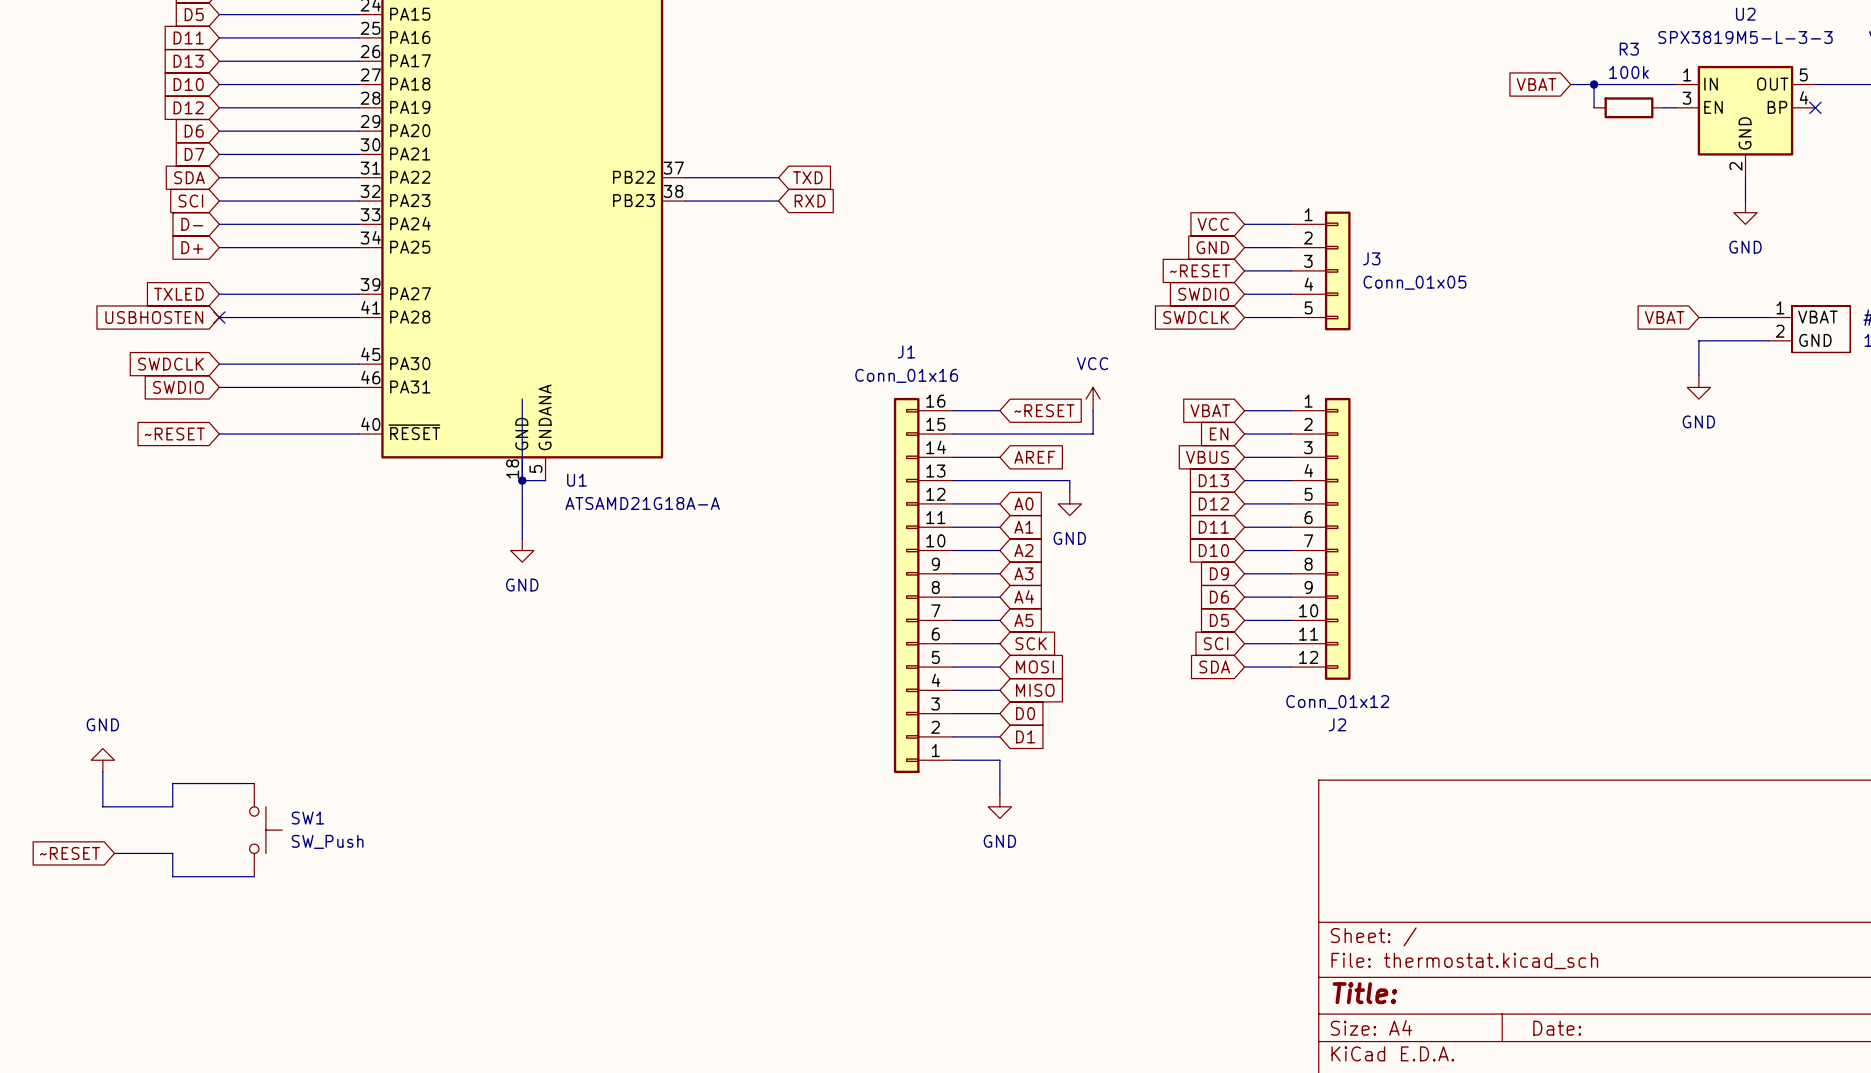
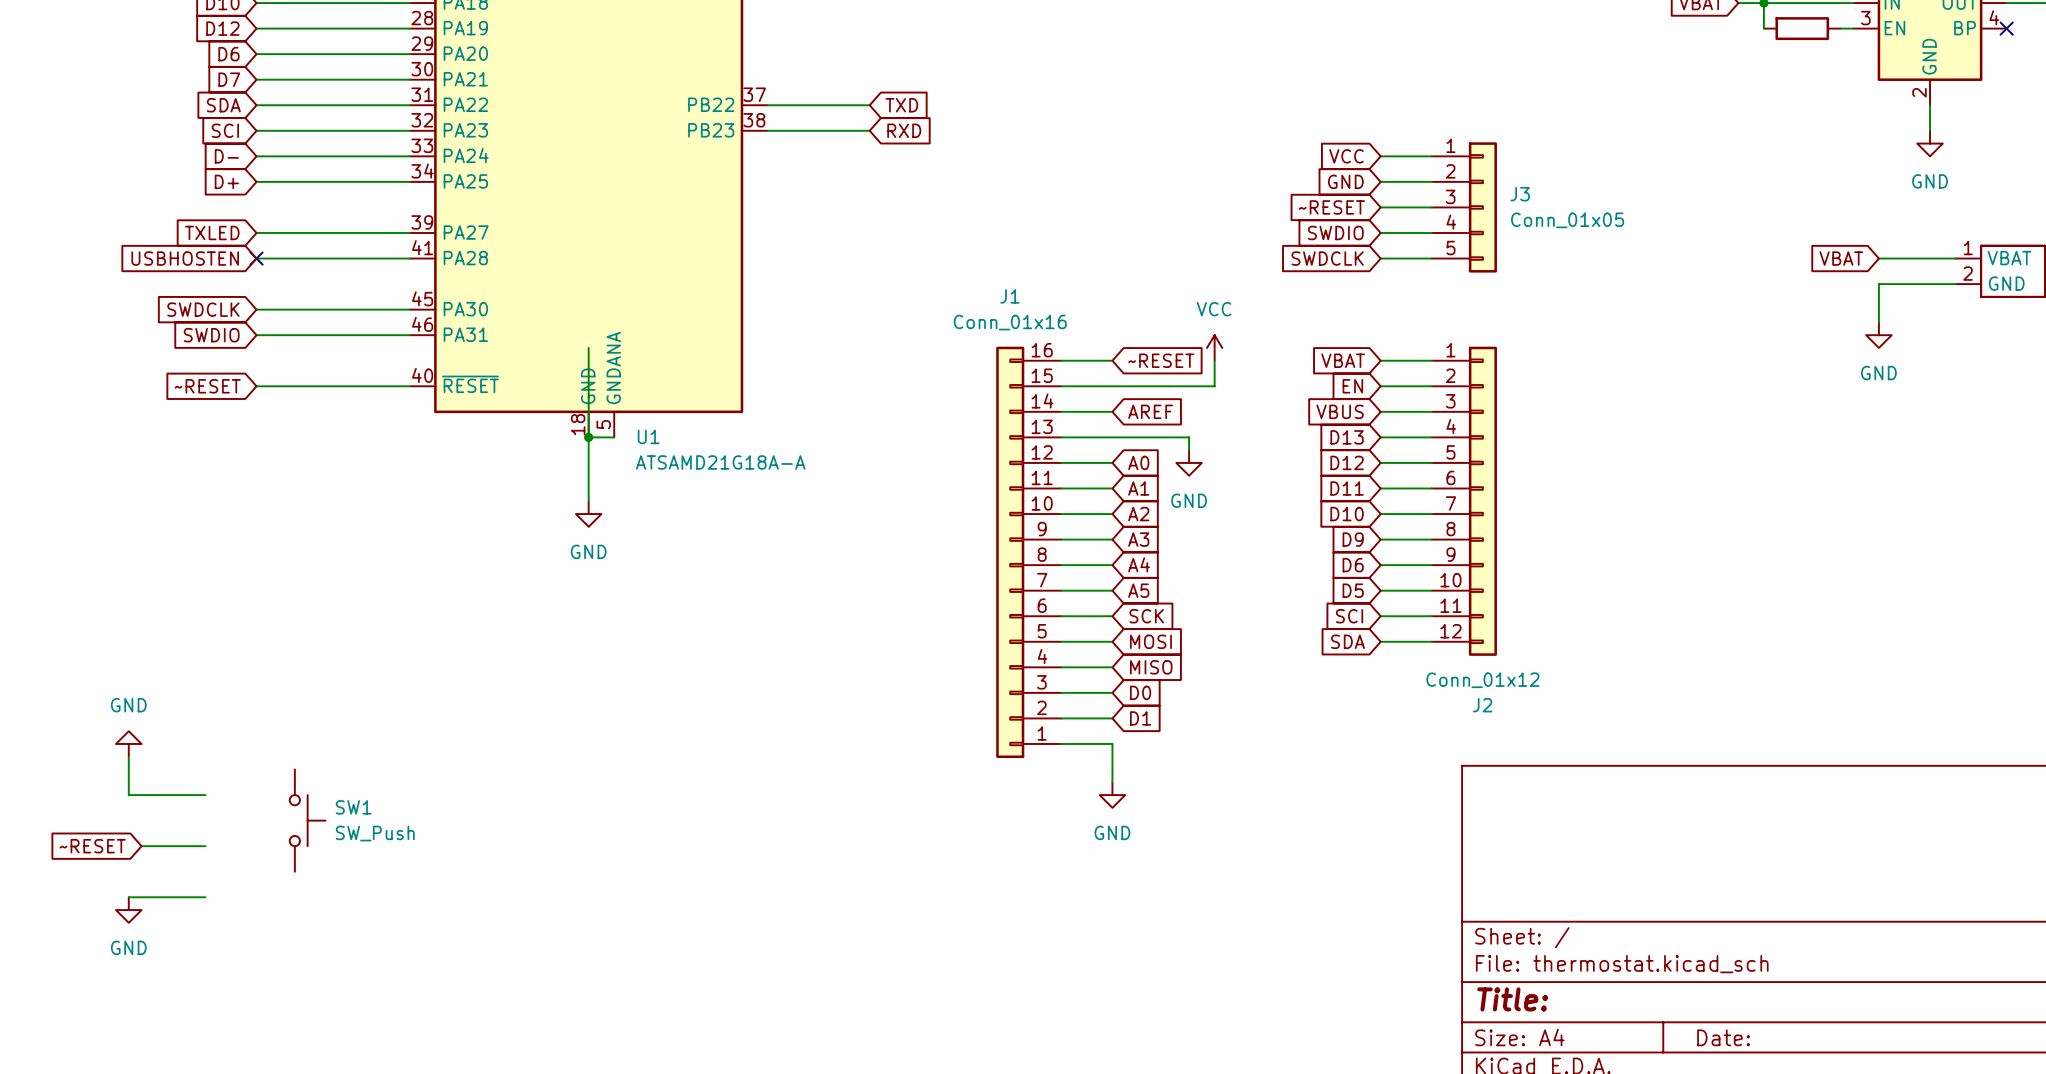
wire: (254, 783) (172, 783) (172, 806) -> none
wire: (172, 853) (172, 876) (254, 876) -> none
wire: none -> (128, 897) (205, 897)
power symbol: none -> GND (128, 910)

